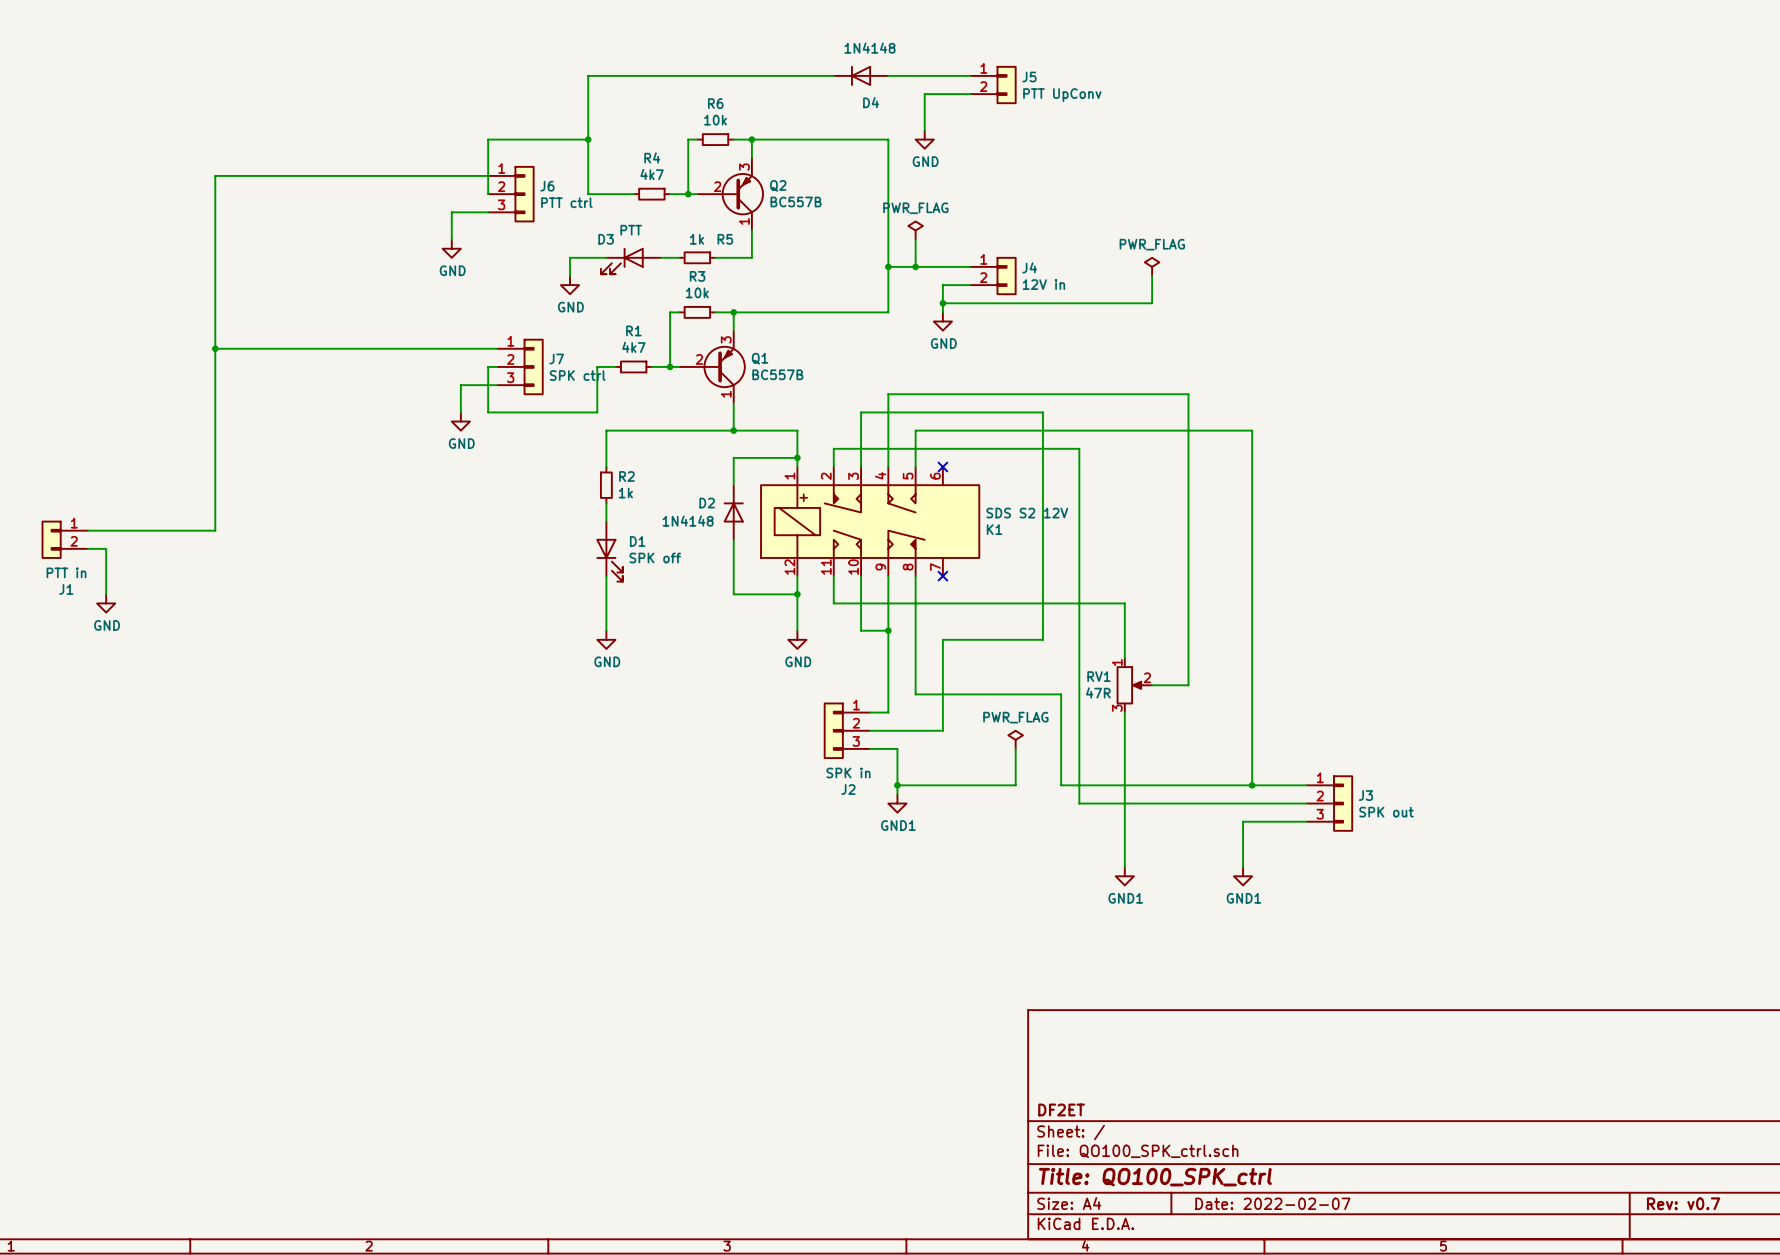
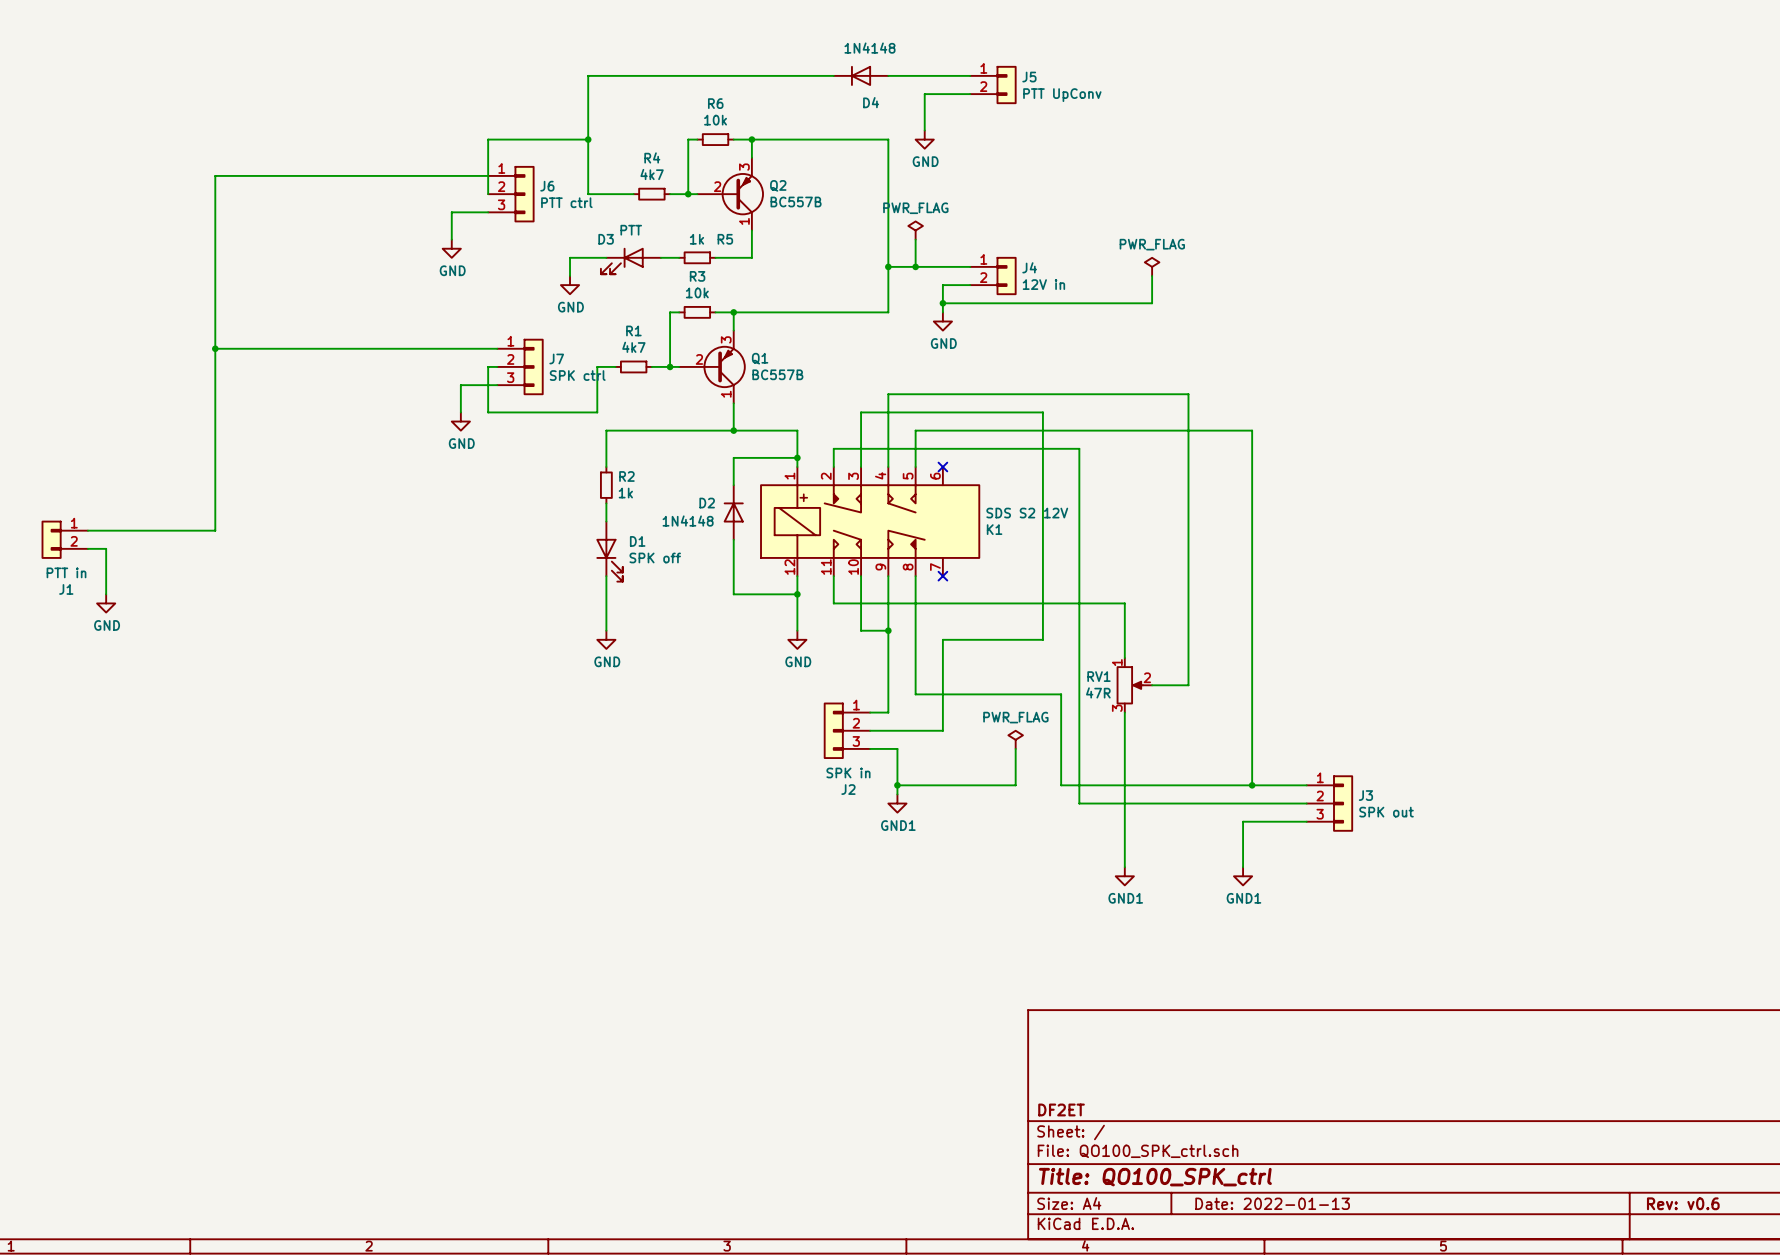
title block: Date: 2022-02-07 (1272, 1203) -> Date: 2022-01-13 (1272, 1203)
title block: Rev: v0.7 (1683, 1203) -> Rev: v0.6 (1683, 1203)

